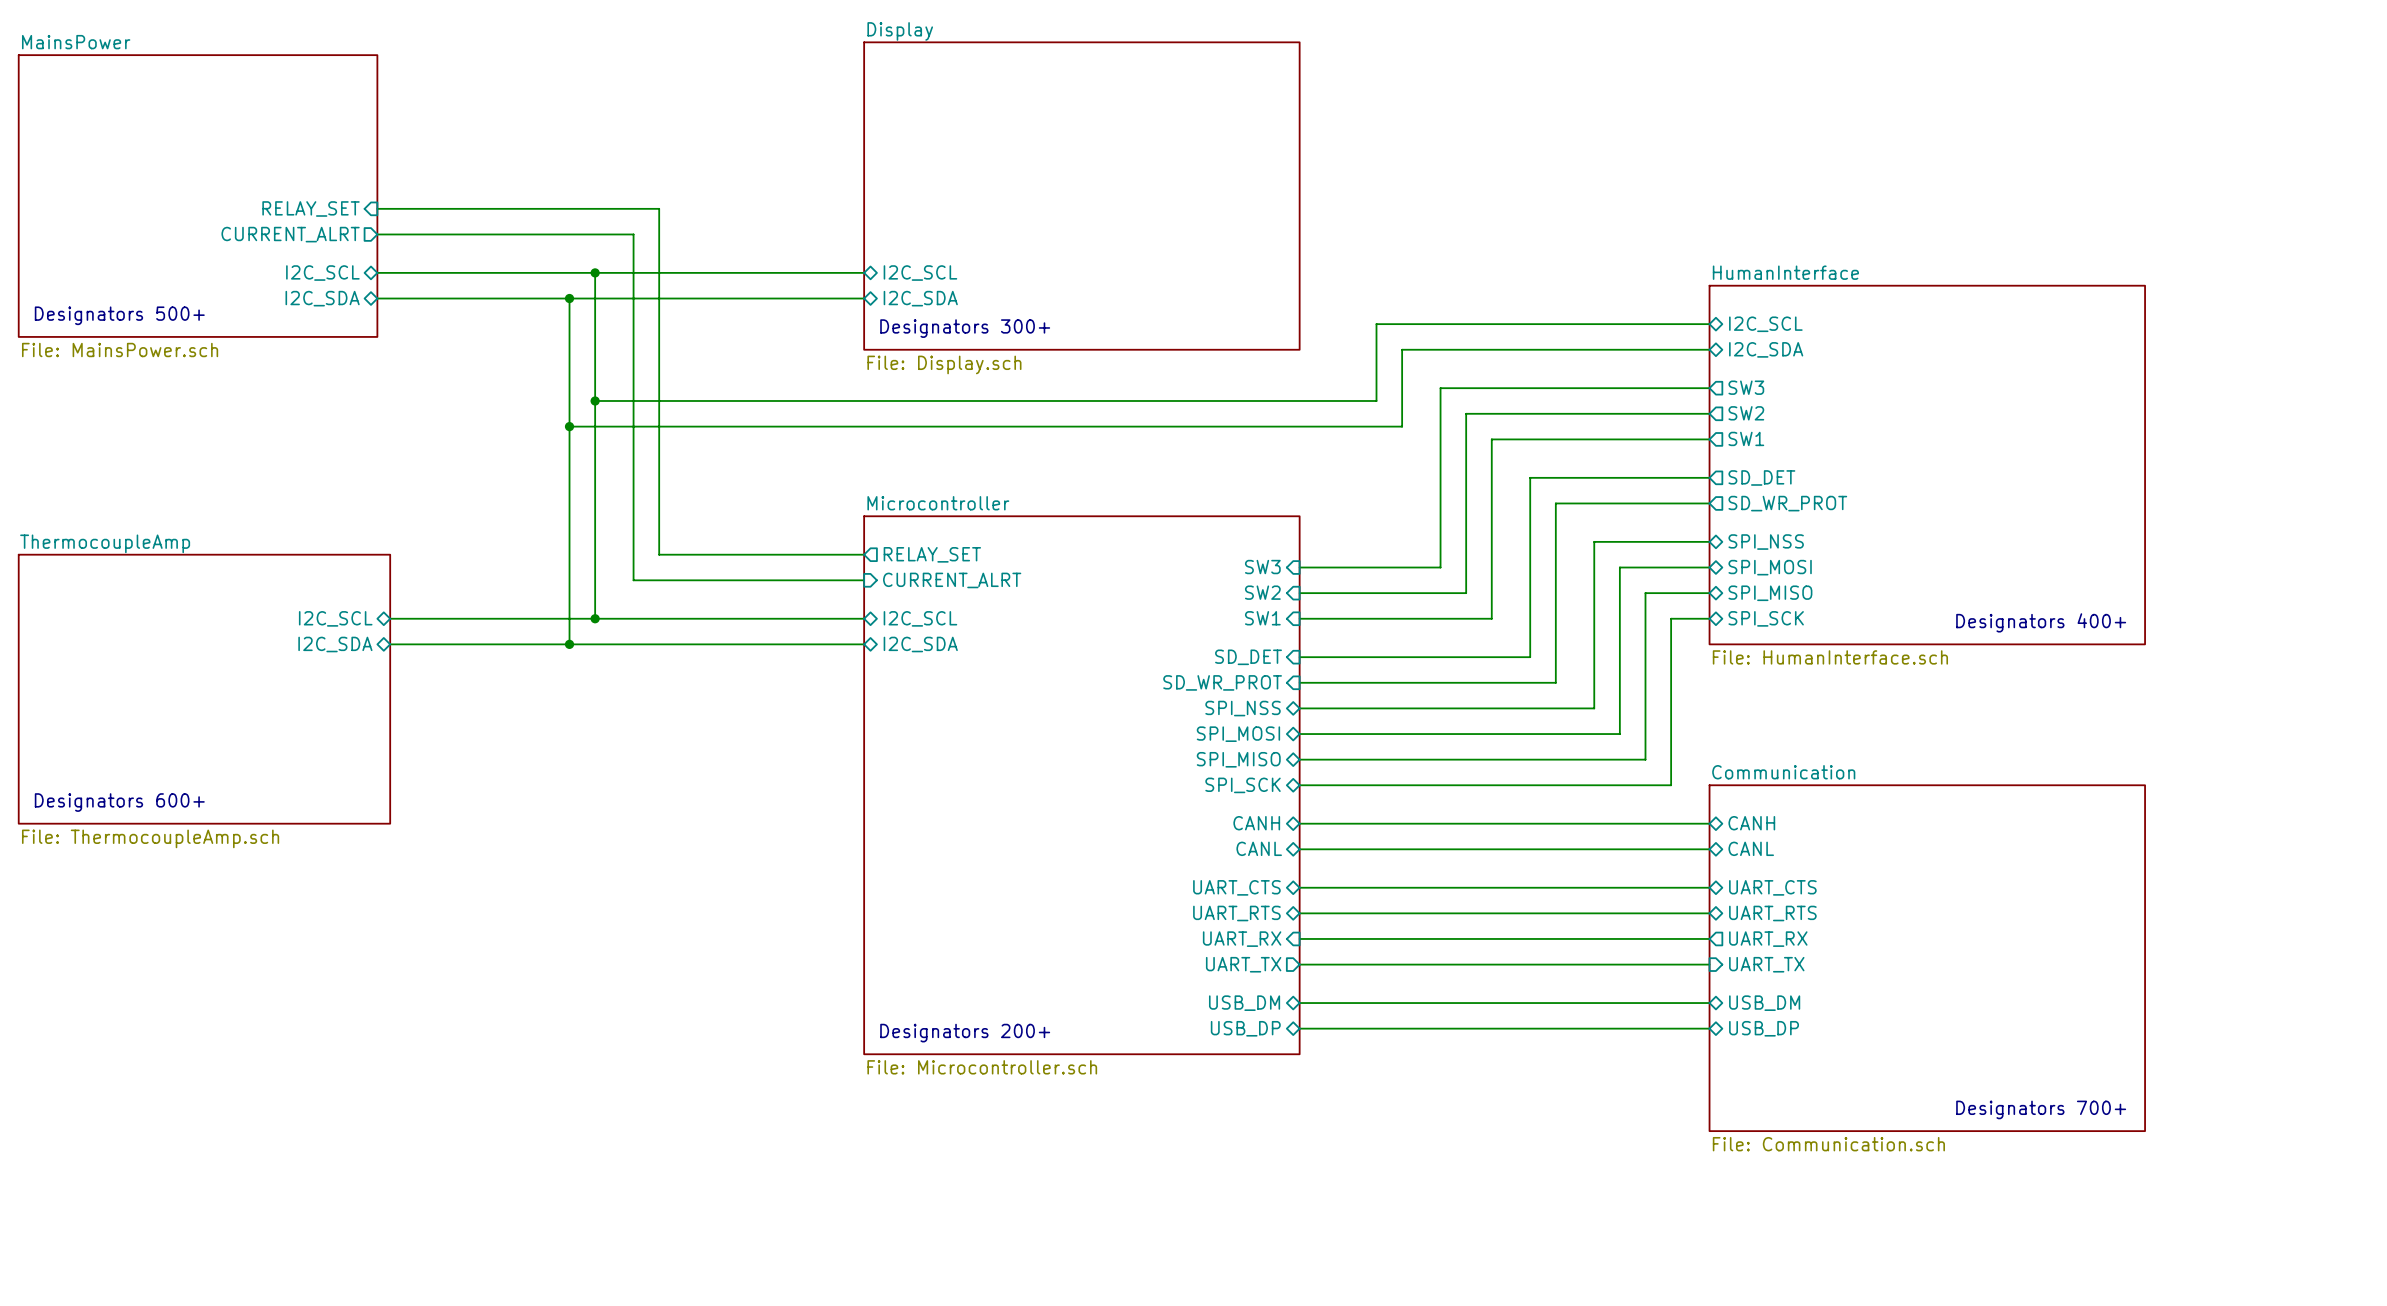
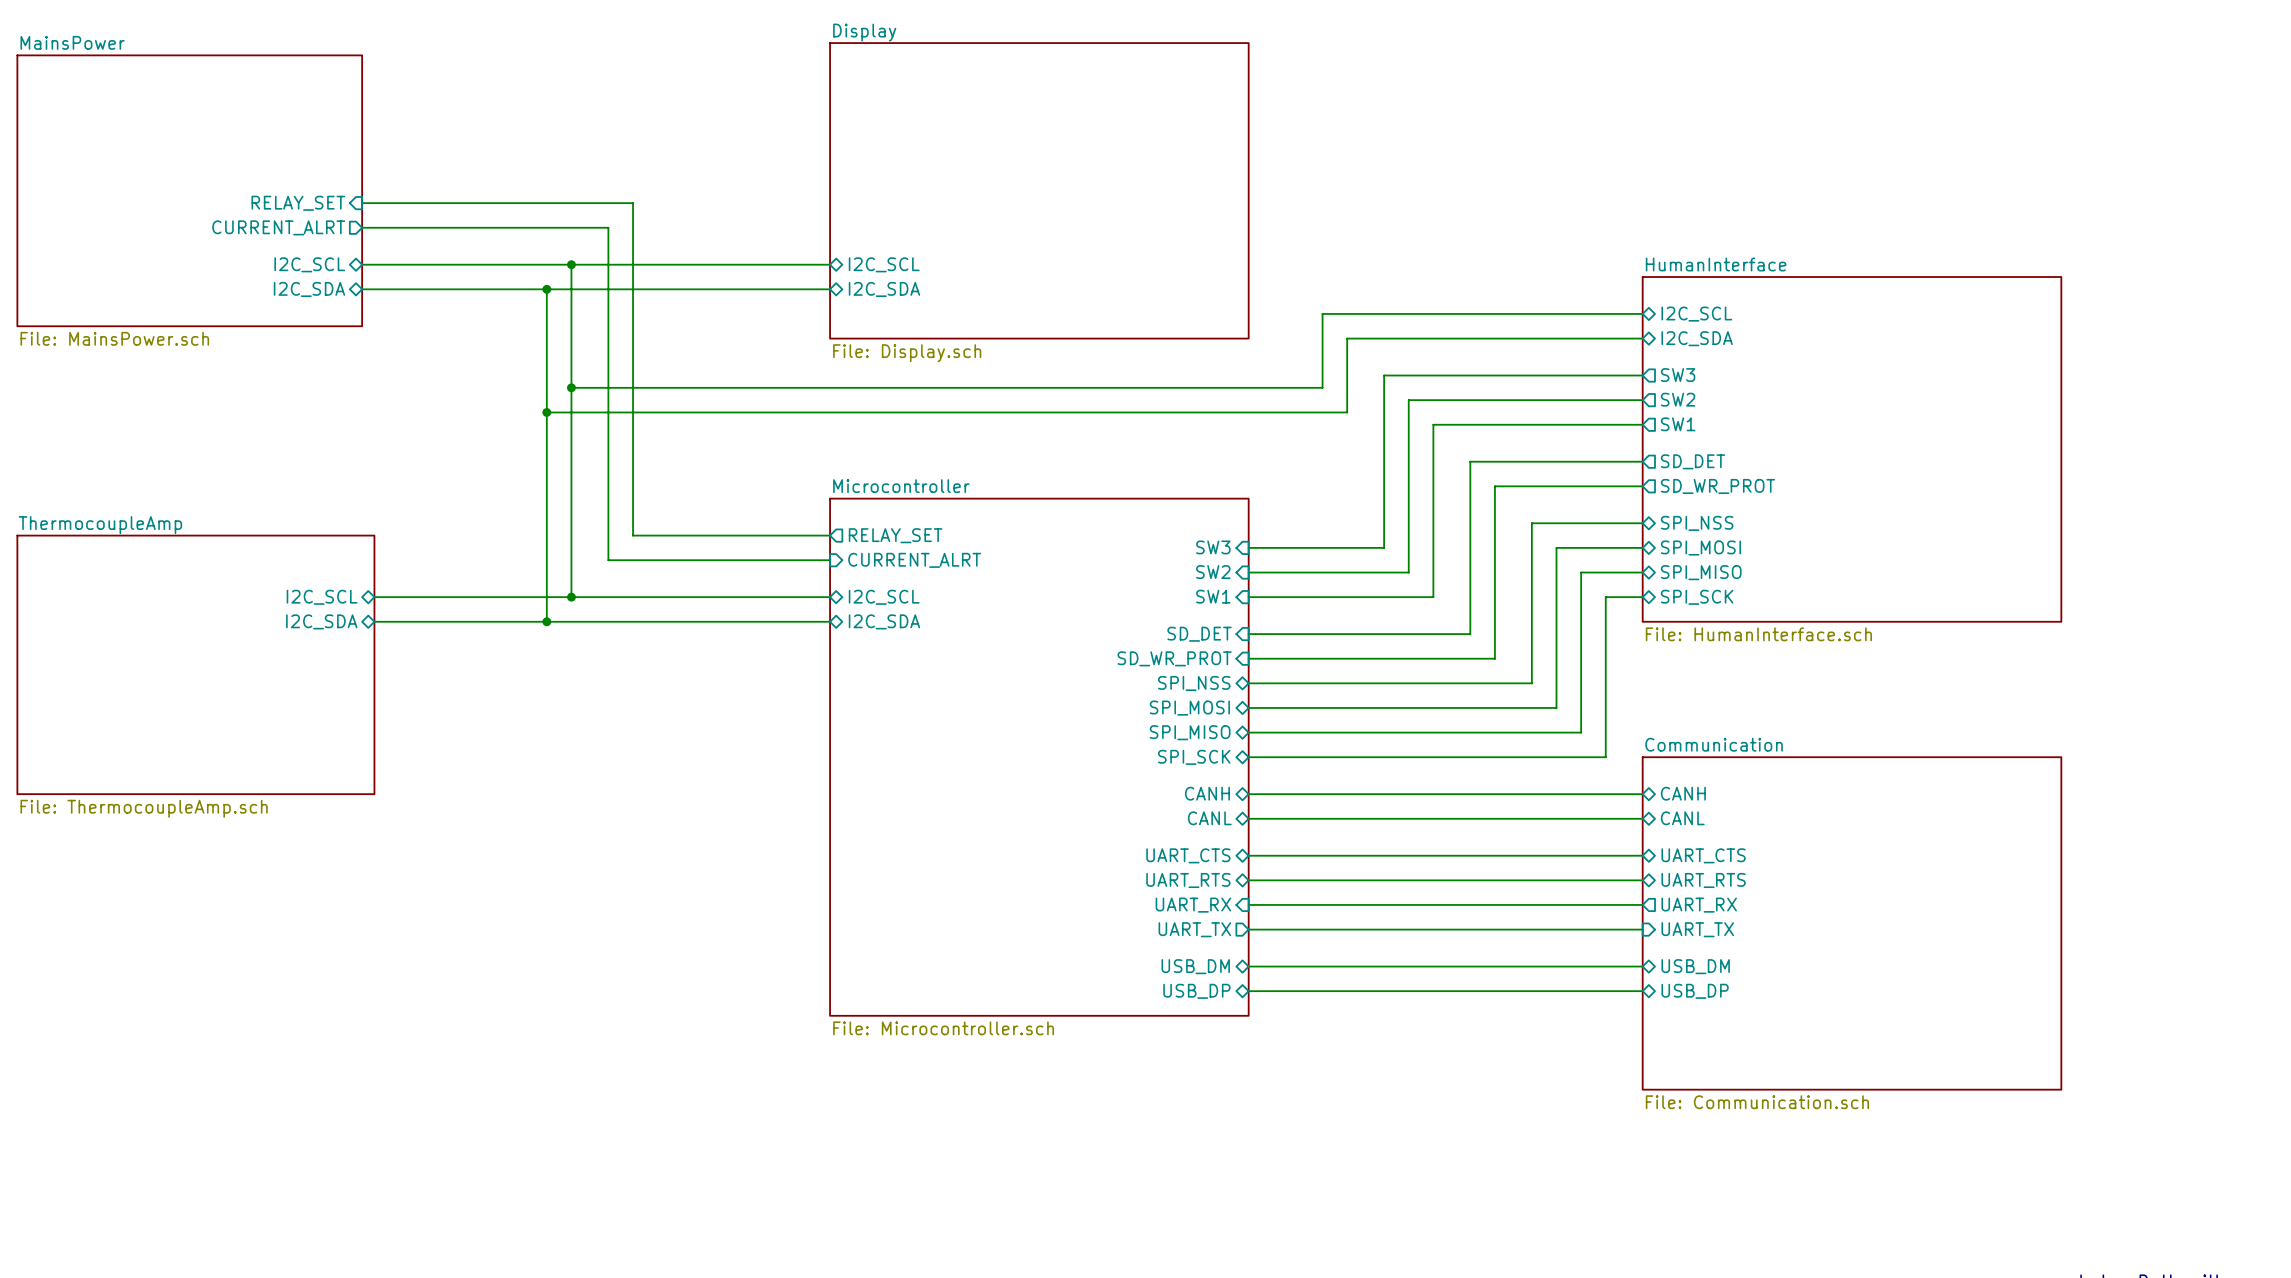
text: Designators 500+ (119, 315) -> none
text: Designators 300+ (965, 328) -> none
text: Designators 400+ (2041, 622) -> none
text: Designators 600+ (119, 802) -> none
text: Designators 200+ (965, 1033) -> none
text: Designators 700+ (2041, 1109) -> none

